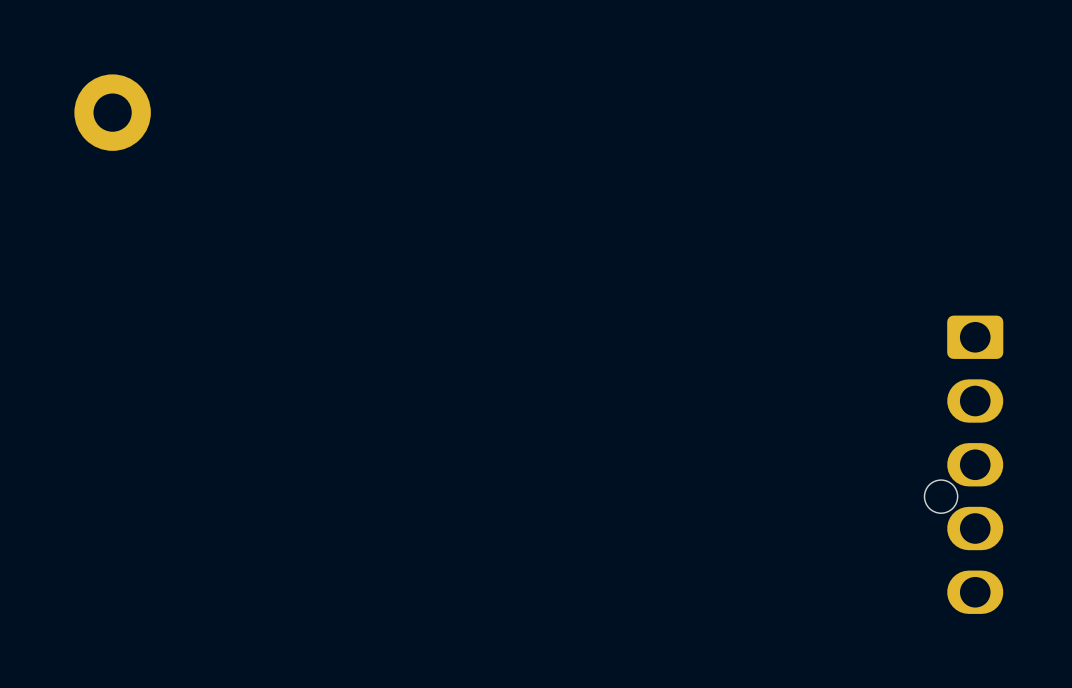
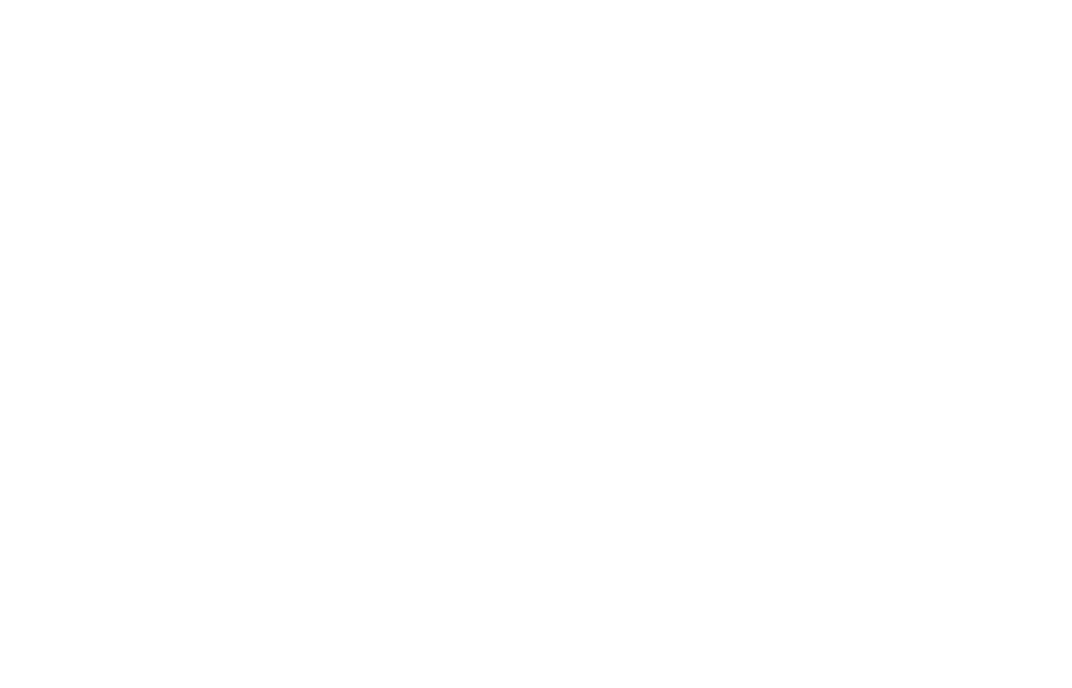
part: (112, 112) -> none
part: (963, 464) -> none

